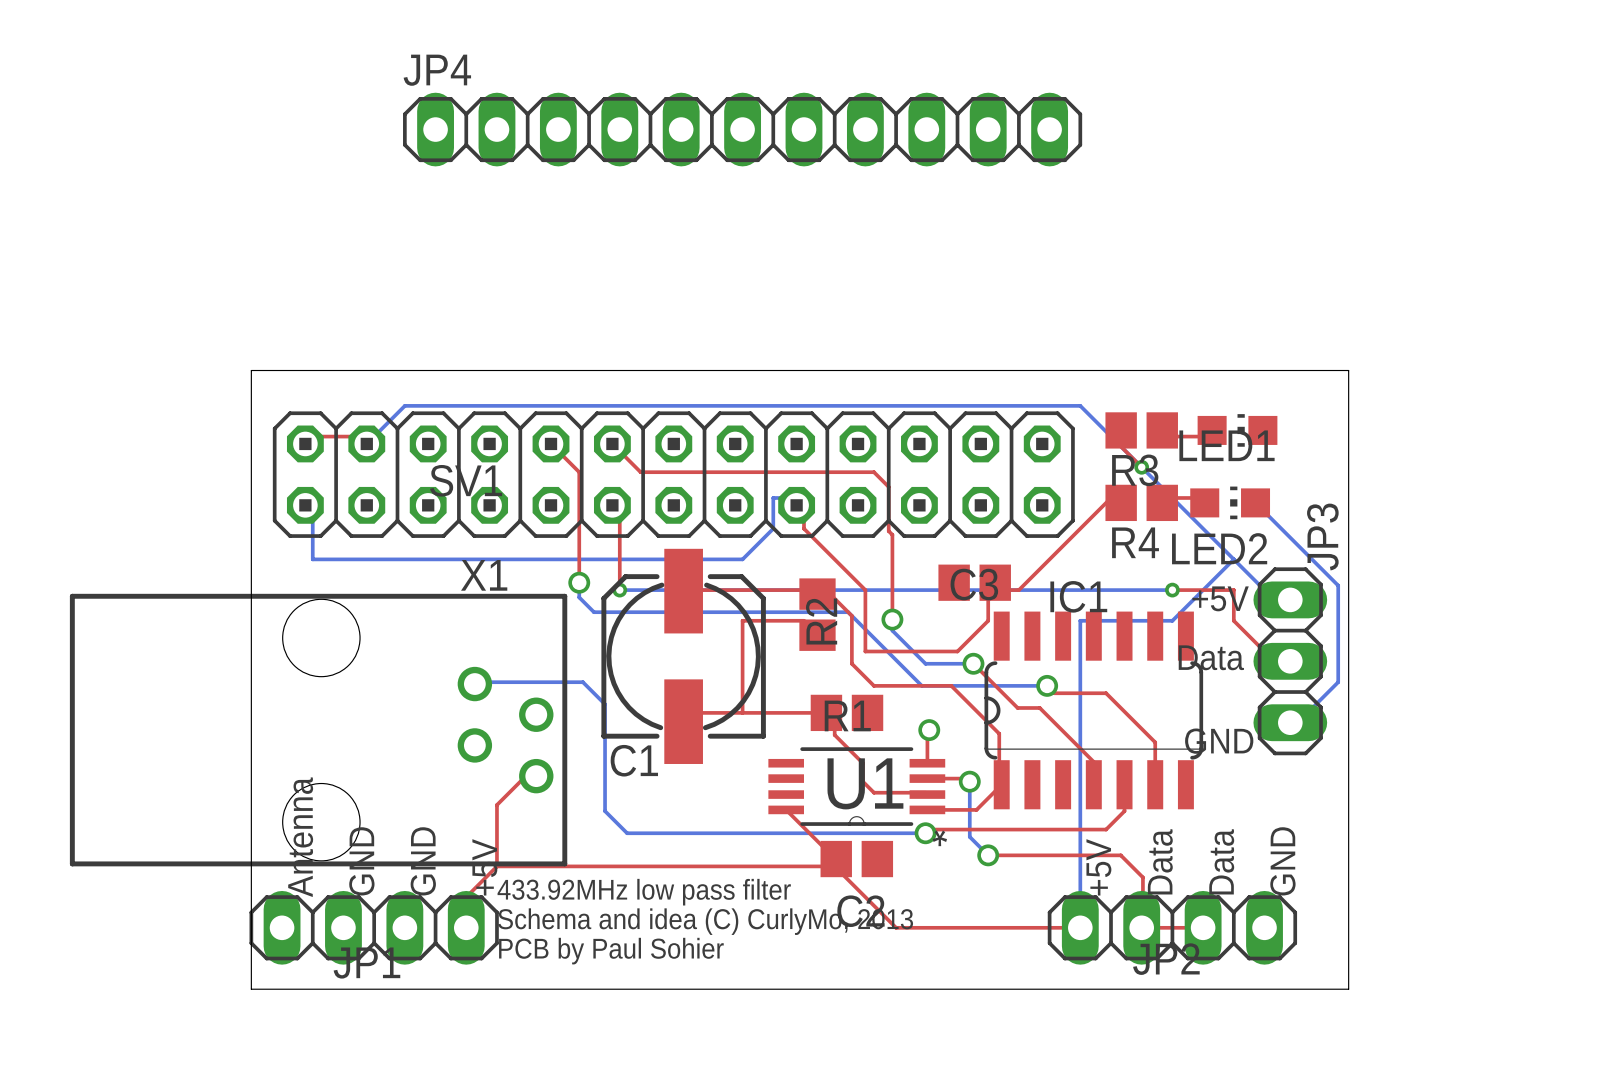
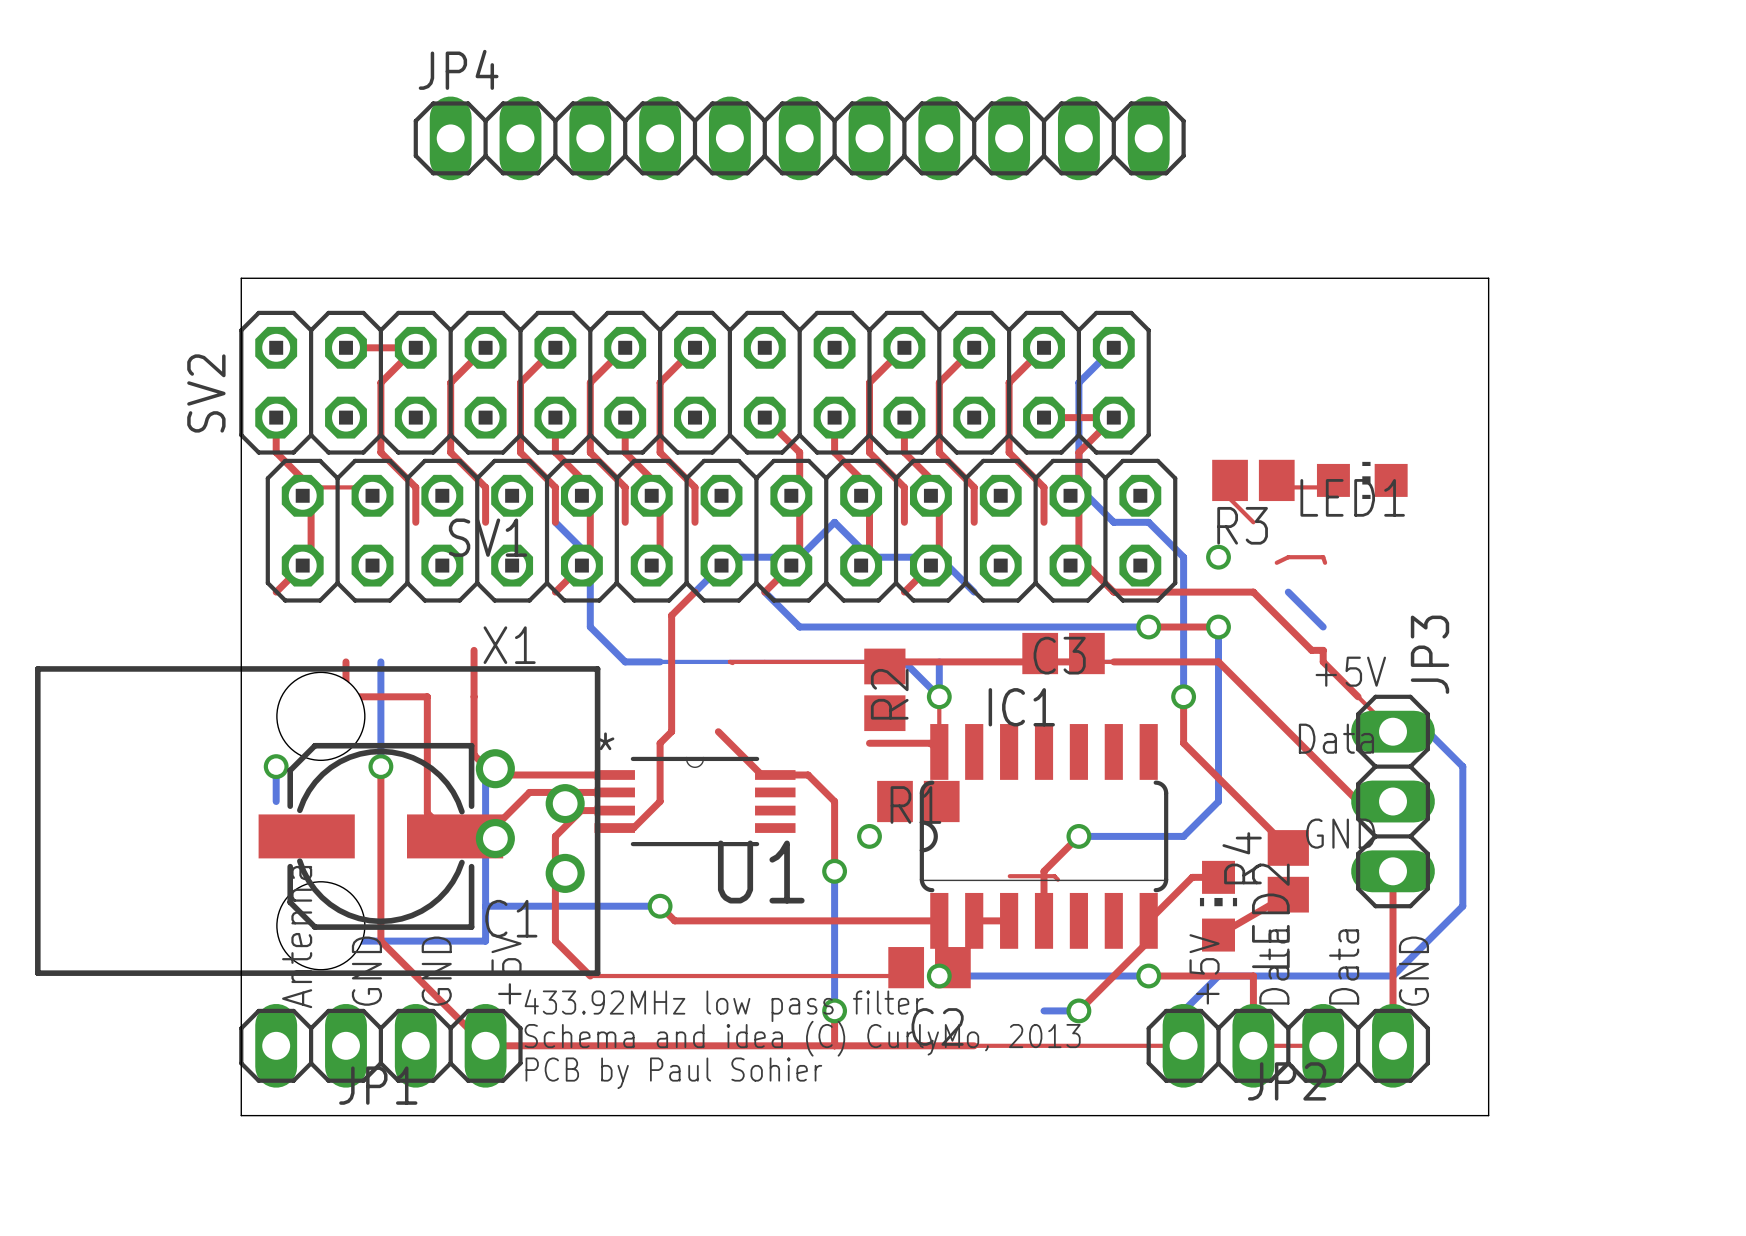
top track: none -> (345, 347) (415, 347) (380, 382) (380, 452) (415, 487) (415, 522)
top track: none -> (485, 347) (450, 382) (450, 452) (485, 487) (485, 522)
top track: none -> (555, 347) (520, 382) (520, 452) (555, 487) (555, 522)
top track: none -> (625, 347) (590, 382) (590, 452) (625, 487) (625, 522)
top track: none -> (695, 347) (660, 382) (660, 452) (695, 487) (695, 522)
top track: none -> (904, 347) (869, 382) (869, 452) (904, 487) (904, 522)
top track: none -> (974, 347) (939, 382) (939, 452) (974, 487) (974, 522)
top track: none -> (1044, 347) (1009, 382) (1009, 452) (1044, 487) (1044, 522)
bottom track: none -> (1113, 347) (1078, 382) (1078, 487) (1113, 522) (1148, 522) (1183, 557) (1183, 696)
SV2: none -> (695, 382)
board edge: (251, 370) (1348, 370) -> (241, 412) (241, 278) (1488, 278) (1488, 412)
top track: none -> (276, 417) (276, 452) (311, 487) (311, 557) (276, 592)
top track: none -> (555, 417) (555, 452) (590, 487) (590, 557) (555, 592)
top track: none -> (764, 417) (799, 452) (799, 557) (764, 592)
top track: none -> (904, 417) (904, 452) (939, 487) (939, 557) (904, 592)
bottom track: (366, 443) (404, 405) (1080, 405) (1264, 590) (1290, 599) -> none
top track: (551, 443) (579, 472) (579, 582) -> none
top track: (612, 443) (640, 472) (873, 472) (888, 486) (888, 531) (892, 534) (892, 619) -> none
bottom track: none -> (555, 522) (590, 557) (590, 627) (625, 661) (660, 661)
via: (1141, 467) -> none
top track: (619, 497) (619, 590) -> (660, 557) (660, 487) (625, 452) (625, 417)
top track: (803, 497) (803, 528) (865, 590) (865, 620) -> (869, 557) (869, 487) (834, 452) (834, 417)
via: none -> (1218, 557)
top track: (1121, 502) (1111, 497) (1018, 590) -> (1393, 801) (1358, 801) (1218, 661) (1113, 661)
R4 rotation: 0° (1141, 502) -> 90° clockwise (1288, 871)
R4 position: (1141, 502) -> (1288, 871)
LED2 rotation: 0° (1230, 502) -> 90° counterclockwise (1218, 906)
LED2 position: (1230, 502) -> (1218, 906)
bottom track: (1255, 502) (1338, 585) (1338, 682) (1297, 722) (1290, 722) -> none
bottom track: (305, 505) (312, 497) (312, 559) (742, 559) (773, 528) (773, 497) (803, 497) (796, 505) -> none
top track: none -> (695, 592) (671, 615) (671, 731) (660, 743) (660, 801) (633, 828) (614, 828)
bottom track: none -> (695, 592) (729, 557) (799, 557) (834, 522) (869, 557) (939, 557) (974, 592)
bottom track: none -> (764, 592) (799, 627) (1148, 627)
bottom track: none -> (1288, 592) (1323, 627)
top track: none -> (1148, 627) (1218, 627)
via: none -> (1148, 627)
bottom track: none -> (1218, 627) (1218, 801) (1183, 836) (1078, 836)
via: none -> (1218, 627)
bottom track: (1233, 559) (1172, 620) (1080, 620) (1080, 897) -> (1393, 731) (1427, 731) (1462, 766) (1462, 906) (1393, 976) (1218, 976) (1183, 1010)
top track: none -> (474, 650) (474, 755) (493, 774) (614, 774)
bottom track: (579, 582) (579, 597) (593, 612) (848, 612) (921, 685) (1047, 685) -> none
via: (579, 582) -> none
top track: (995, 582) (988, 590) (988, 620) (957, 651) (865, 651) -> (869, 743) (930, 743) (939, 751) (939, 731)
top track: none -> (345, 661) (345, 685) (334, 696) (427, 696) (427, 813) (450, 836)
bottom track: none -> (380, 661) (380, 766)
via: (619, 590) -> none
top track: (803, 590) (817, 594) (830, 594) (851, 615) (851, 663) (873, 685) (951, 685) (999, 733) (999, 782) (1001, 784) (976, 809) (927, 809) -> (869, 661) (1078, 661)
bottom track: (834, 590) (865, 590) -> (904, 661) (939, 696) (939, 661)
bottom track: (1080, 590) (1172, 590) -> none
top track: (1172, 590) (1233, 590) (1233, 620) -> (1044, 417) (1113, 417) (1078, 452) (1078, 557) (1113, 592) (1253, 592) (1311, 650) (1323, 650) (1323, 661) (1358, 696)
via: (1172, 590) -> none
bottom track: (892, 619) (892, 630) (925, 663) (973, 663) -> none
via position: (892, 619) -> (939, 696)
top track: none -> (1183, 696) (1183, 743) (1288, 847)
via: none -> (1183, 696)
top track: (817, 635) (803, 620) (742, 620) (742, 712) -> none
top track: none -> (718, 731) (761, 774) (808, 774) (834, 801) (834, 871)
C1 rotation: 0° (683, 656) -> 90° counterclockwise (380, 836)
C1 position: (683, 656) -> (380, 836)
JP3 position: (1290, 661) -> (1393, 801)
top track: (973, 663) (1017, 707) (1039, 707) (1093, 762) (1093, 784) -> none
via: (973, 663) -> none
bottom track: none -> (276, 766) (276, 801)
via: none -> (276, 766)
via: none -> (380, 766)
bottom track: none -> (485, 766) (485, 941) (311, 941)
bottom track: (474, 684) (476, 682) (582, 682) (605, 704) (605, 811) (627, 833) (925, 833) -> none
top track: (1047, 685) (1054, 693) (1106, 693) (1155, 742) (1155, 784) -> none
via: (1047, 685) -> none
top track: none -> (614, 792) (529, 792) (485, 836)
IC1 position: (1093, 710) -> (1044, 836)
top track: (683, 721) (681, 712) (834, 712) (834, 735) (862, 763) (862, 781) (873, 792) (925, 792) (927, 794) -> none
top track: (929, 730) (927, 731) (927, 763) -> none
via: (929, 730) -> none
via: none -> (869, 836)
top track: none -> (1078, 836) (1044, 871) (1044, 920)
via: none -> (1078, 836)
bottom track: none -> (834, 871) (834, 1010)
via: none -> (834, 871)
top track: none -> (1393, 871) (1393, 1045)
top track: (536, 776) (527, 774) (496, 805) (496, 866) -> none
top track: none -> (1218, 877) (1192, 877) (1148, 920) (1148, 941) (1078, 1010)
bottom track: (969, 781) (969, 836) (988, 855) -> none
via: (969, 781) -> none
U1 name position: U1 (865, 783) -> U1 (761, 872)
top track: (1124, 784) (1124, 811) (1106, 829) (929, 829) (925, 833) -> none
U1 rotation: 0° (856, 786) -> 180° (695, 801)
U1 position: (856, 786) -> (695, 801)
top track: none -> (1288, 894) (1218, 935)
bottom track: none -> (485, 906) (660, 906)
top track: none -> (660, 906) (674, 920) (939, 920)
via: none -> (660, 906)
top track: (786, 809) (836, 859) (834, 866) (896, 927) -> (380, 766) (380, 941) (485, 1045) (974, 1045)
top track: none -> (974, 920) (1009, 920)
via: (925, 833) -> none
top track: (988, 855) (1120, 855) (1142, 877) (1141, 927) -> (1148, 976) (1253, 976) (1253, 1045)
via: (988, 855) -> none
top track: (496, 866) (558, 866) -> (614, 810) (581, 810) (555, 836) (555, 941) (590, 976)
top track: (496, 866) (466, 897) (466, 927) -> none
bottom track: none -> (939, 976) (1148, 976)
via: none -> (939, 976)
via: none -> (1148, 976)
top track: none -> (834, 1010) (834, 1045)
via: none -> (834, 1010)
bottom track: none -> (1044, 1010) (1078, 1010)
via: none -> (1078, 1010)

